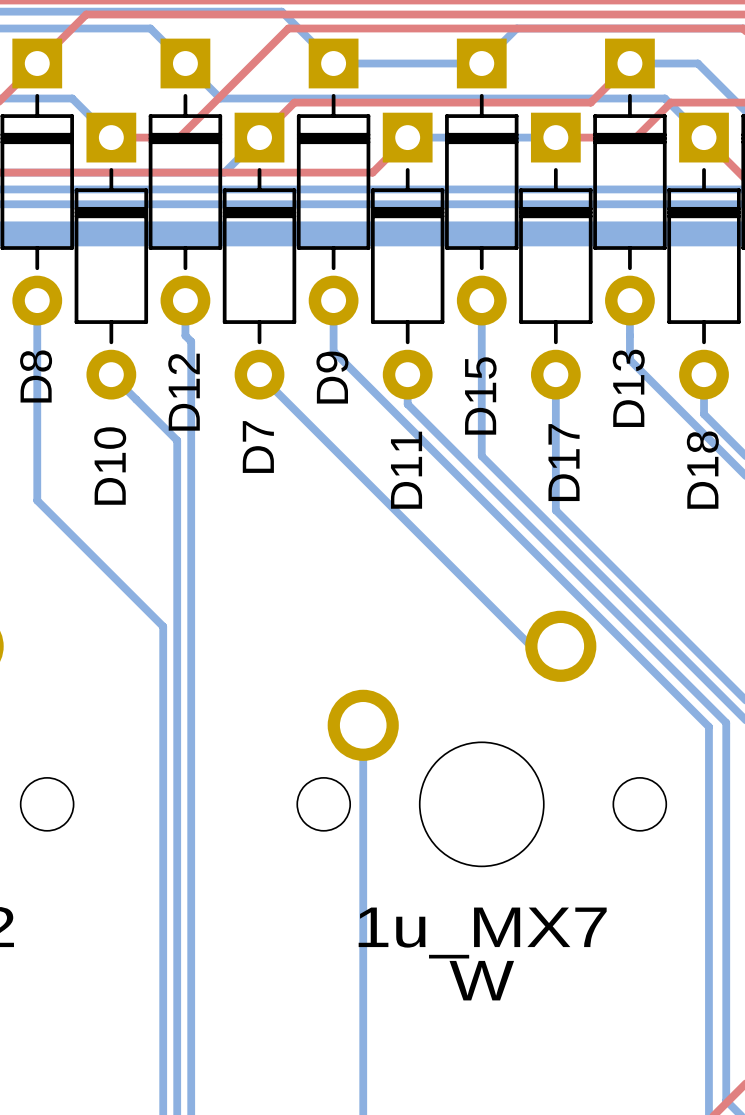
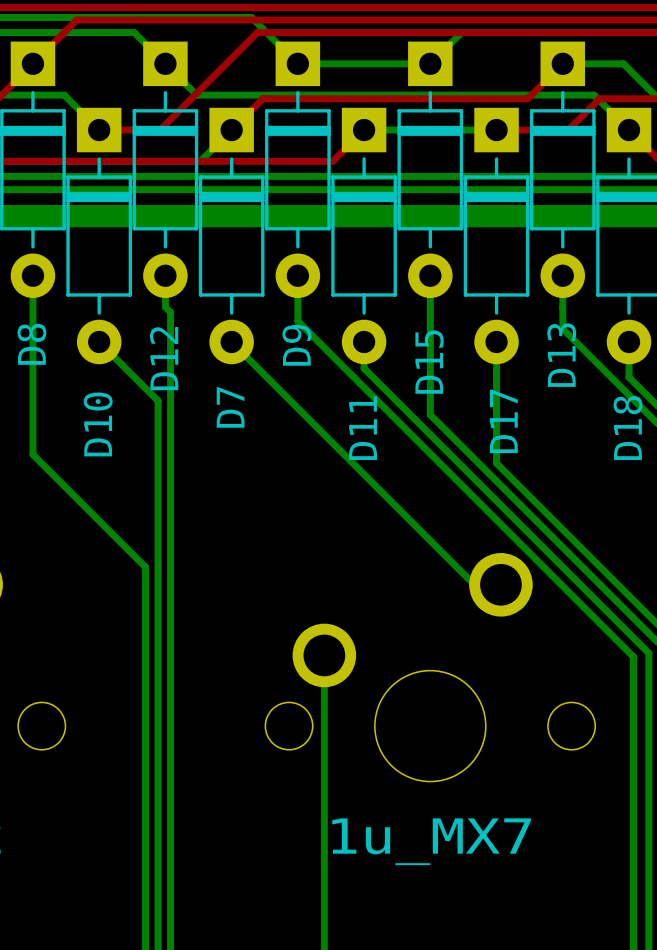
1u_MX7 value: W (481, 980) -> none

